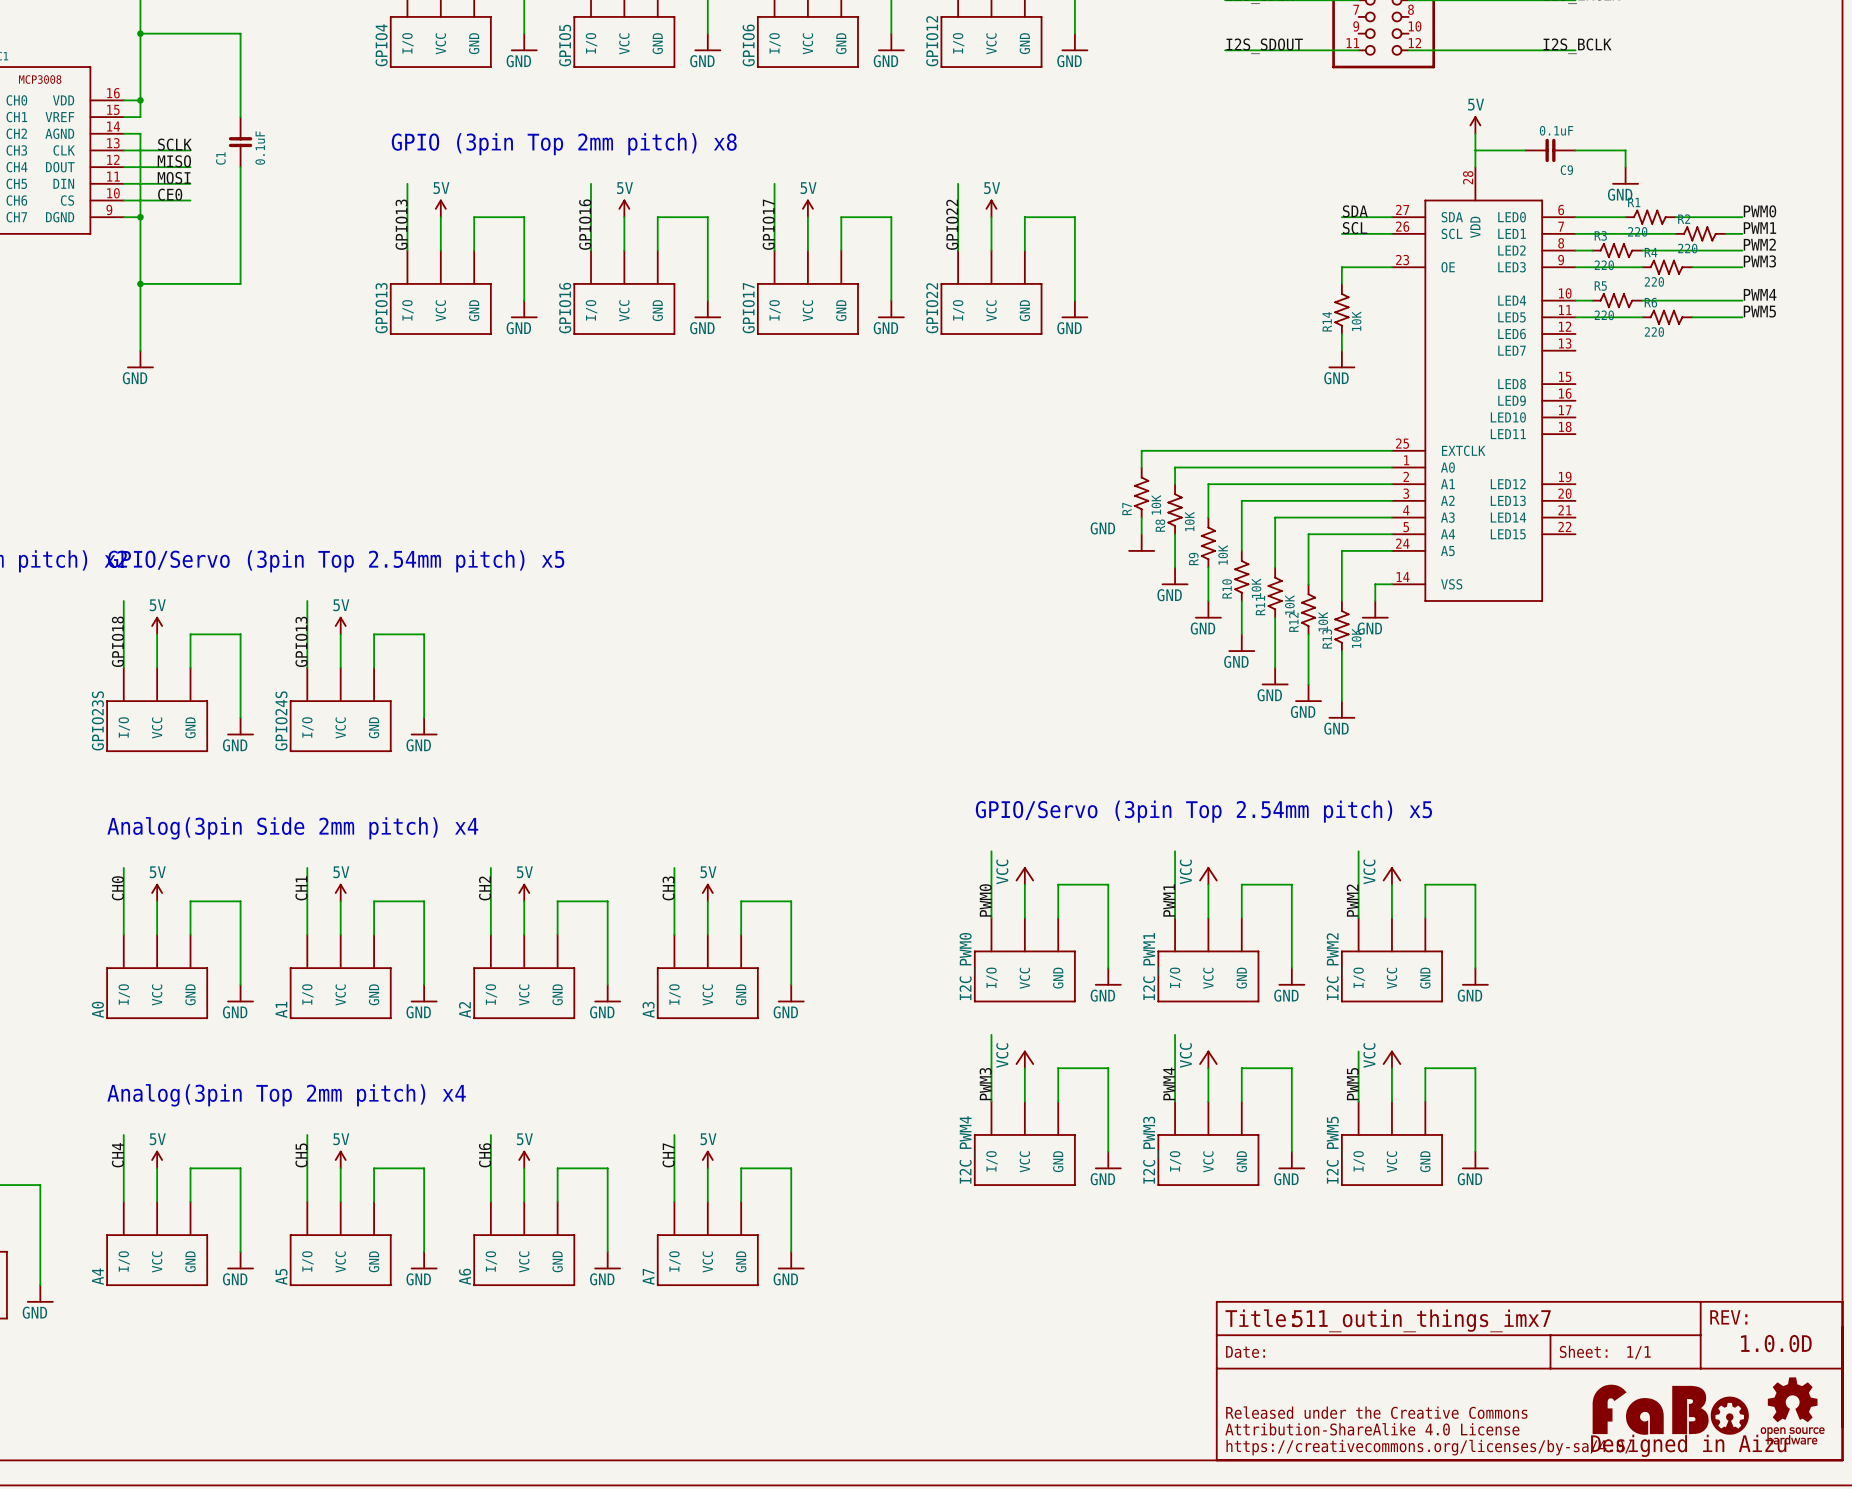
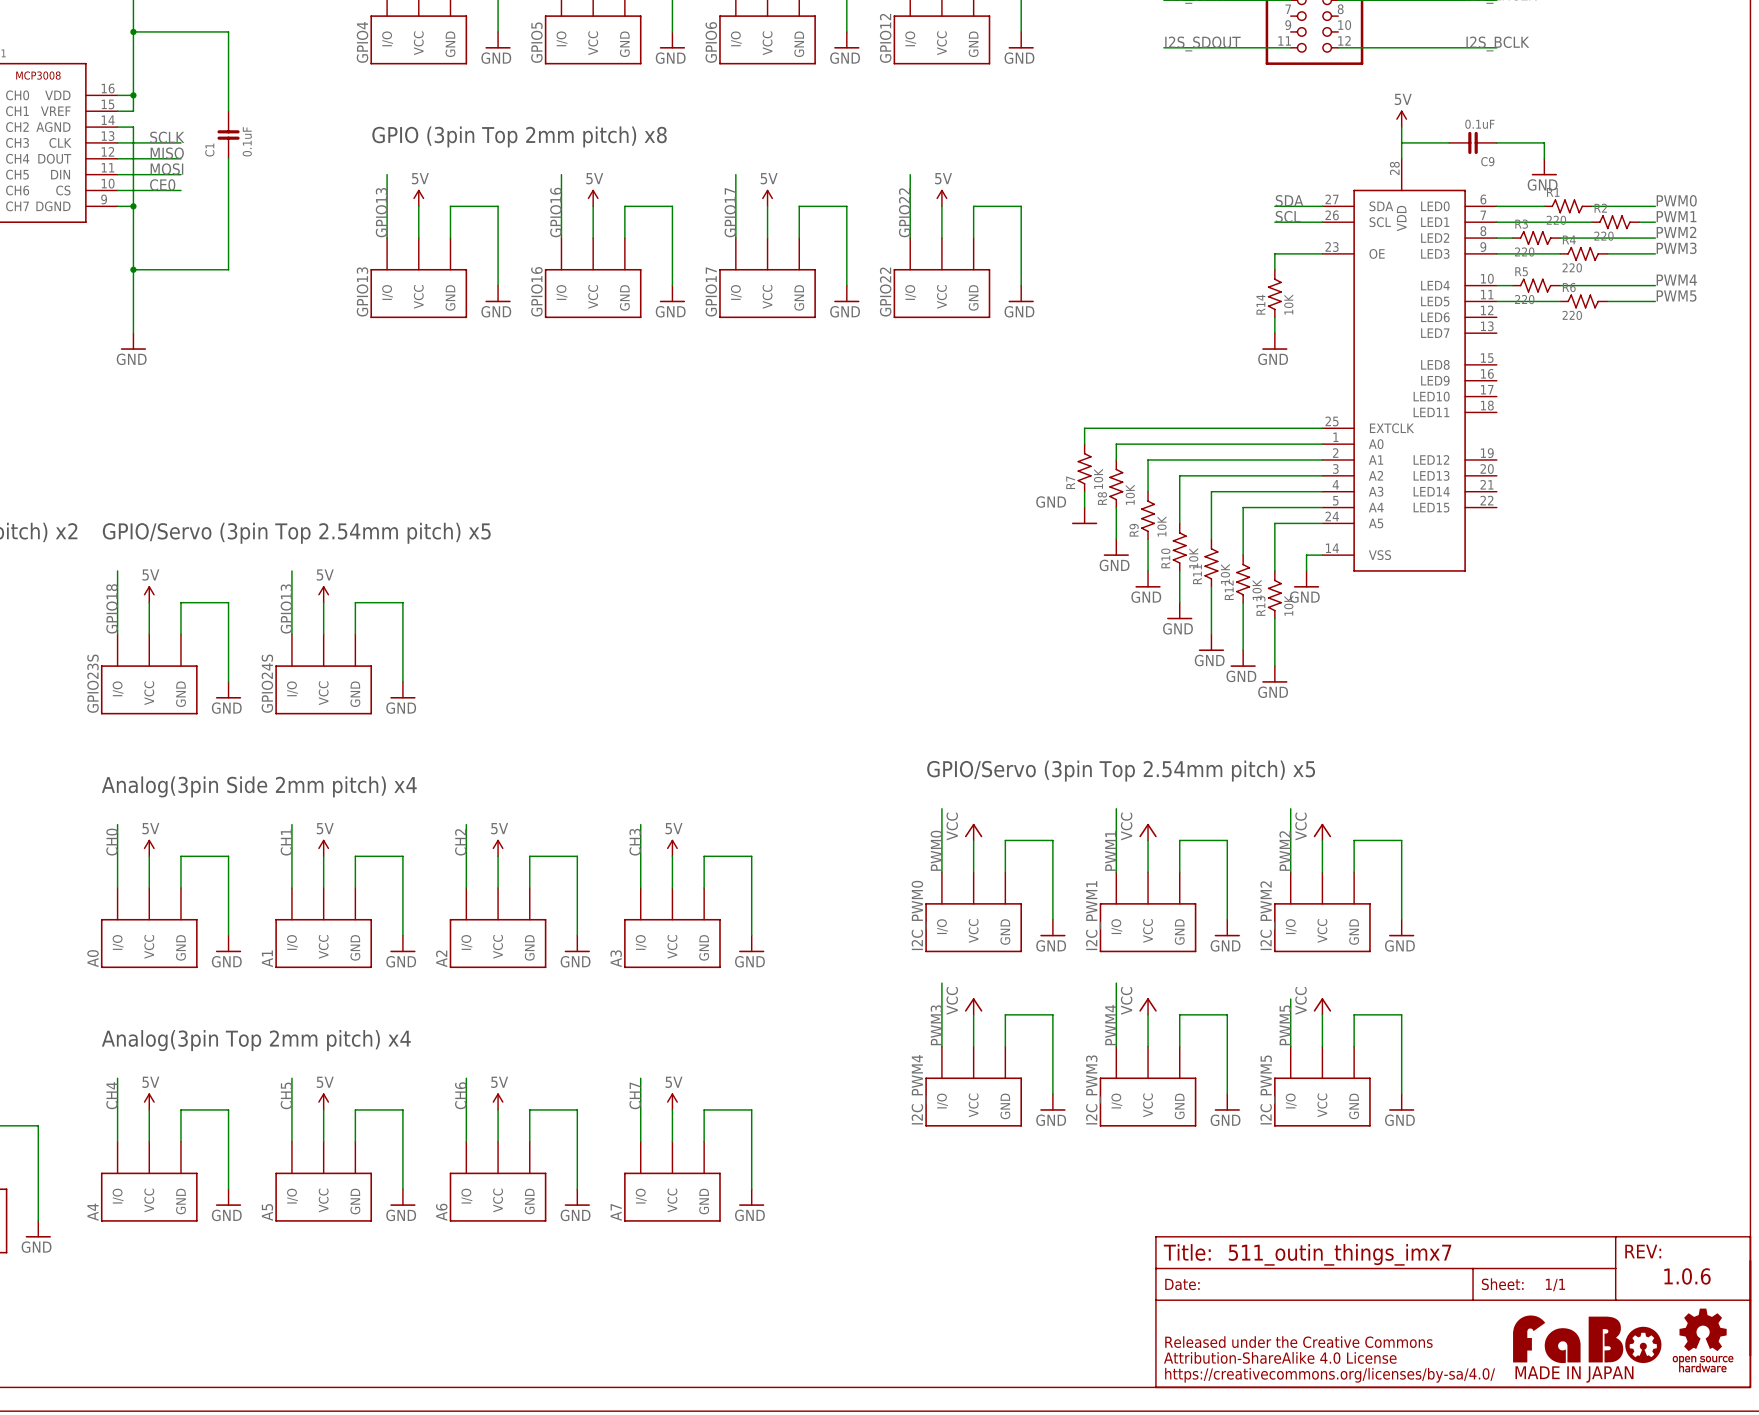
text: 1.0.0D (1776, 1343) -> 1.0.6 (1687, 1276)
part text: none -> MADE IN JAPAN (1574, 1374)
part text: Designed in Aizu (1688, 1445) -> none

